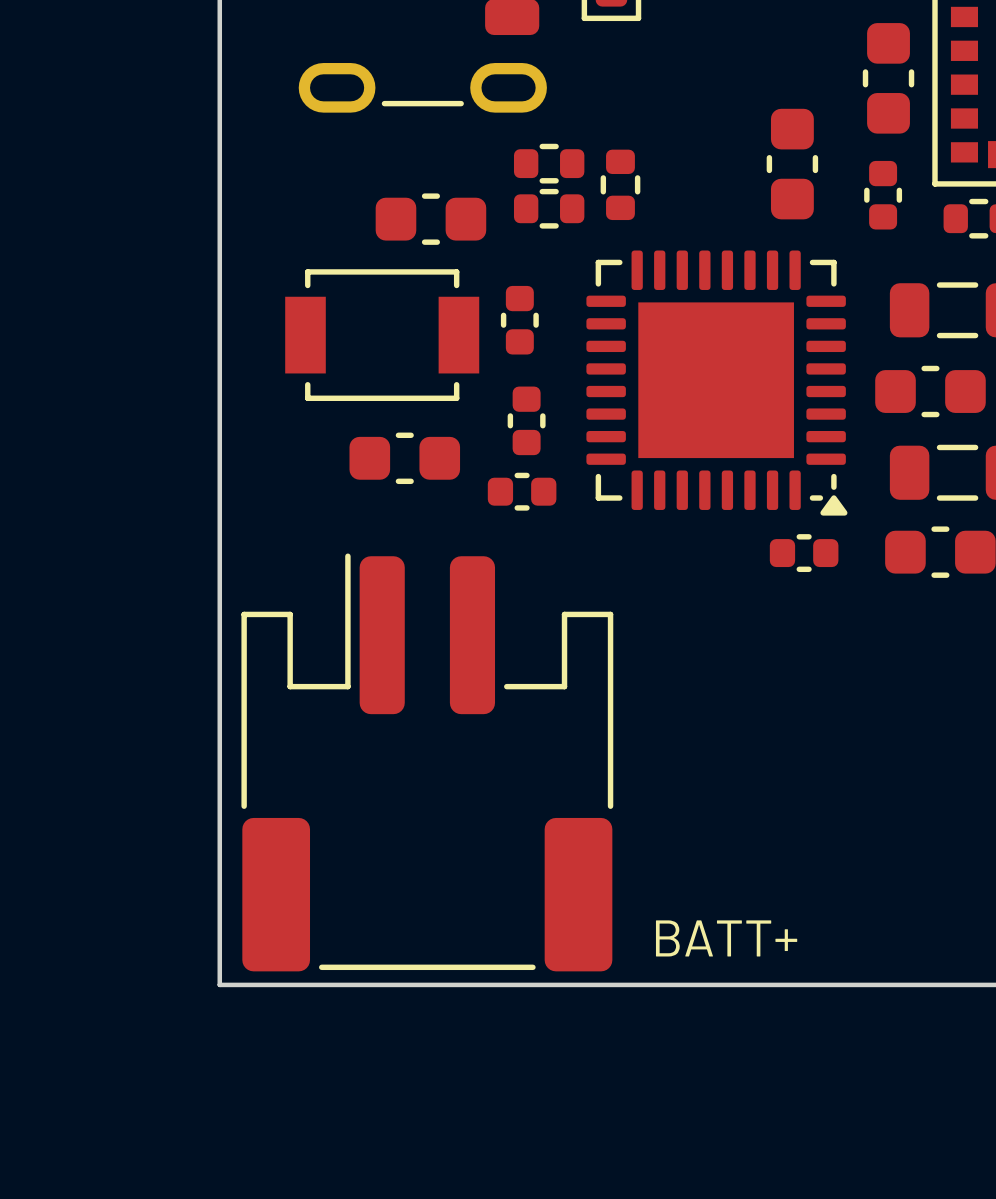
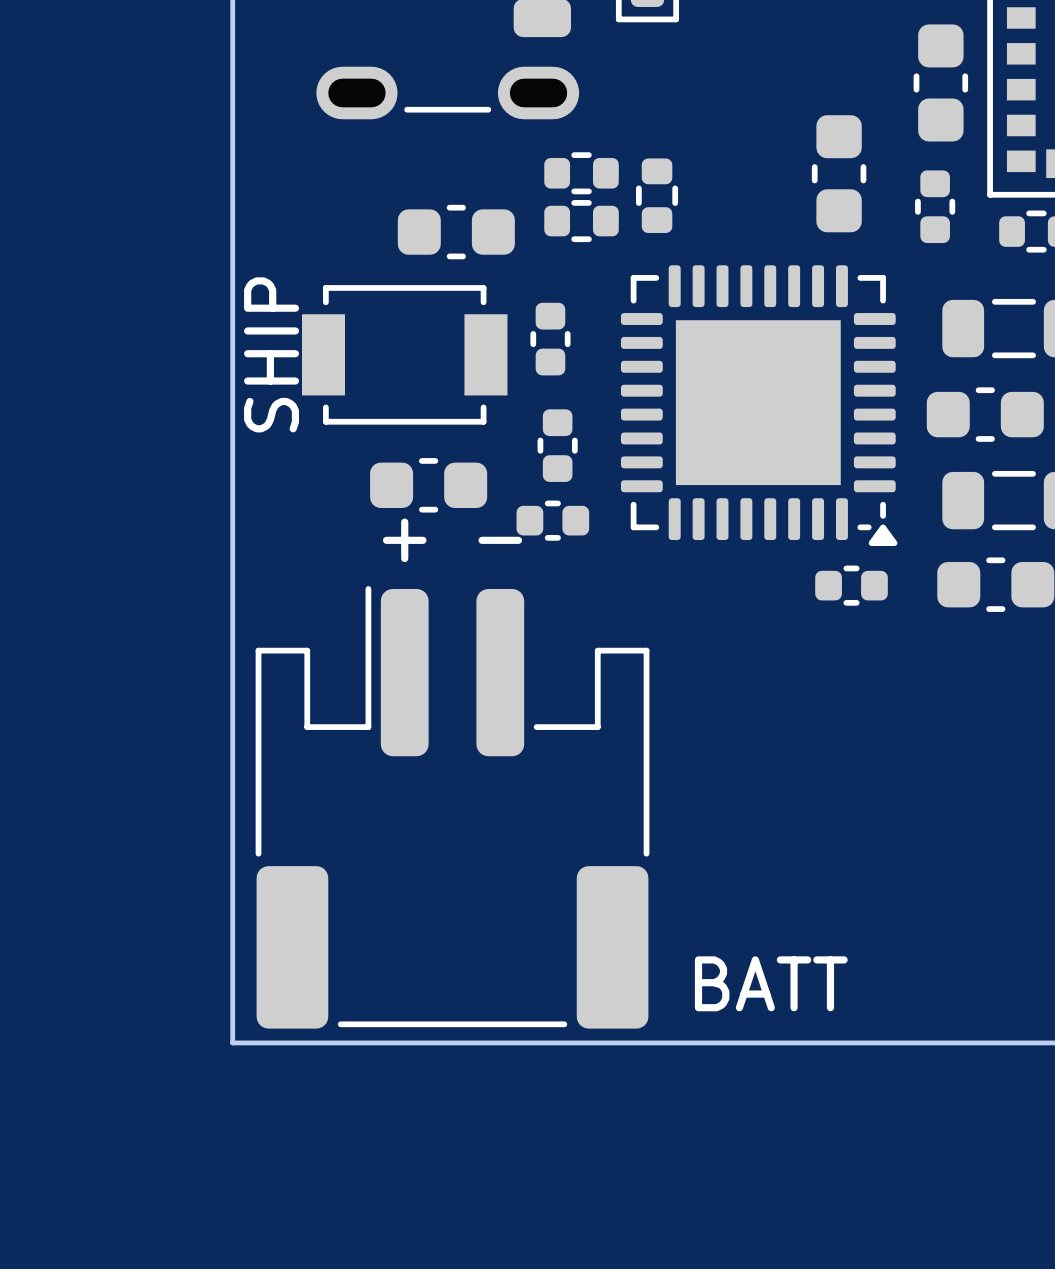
text: none -> SHIP (271, 354)
text: none -> + (404, 540)
text: none -> - (500, 540)
text: BATT+ (726, 938) -> BATT (771, 983)

